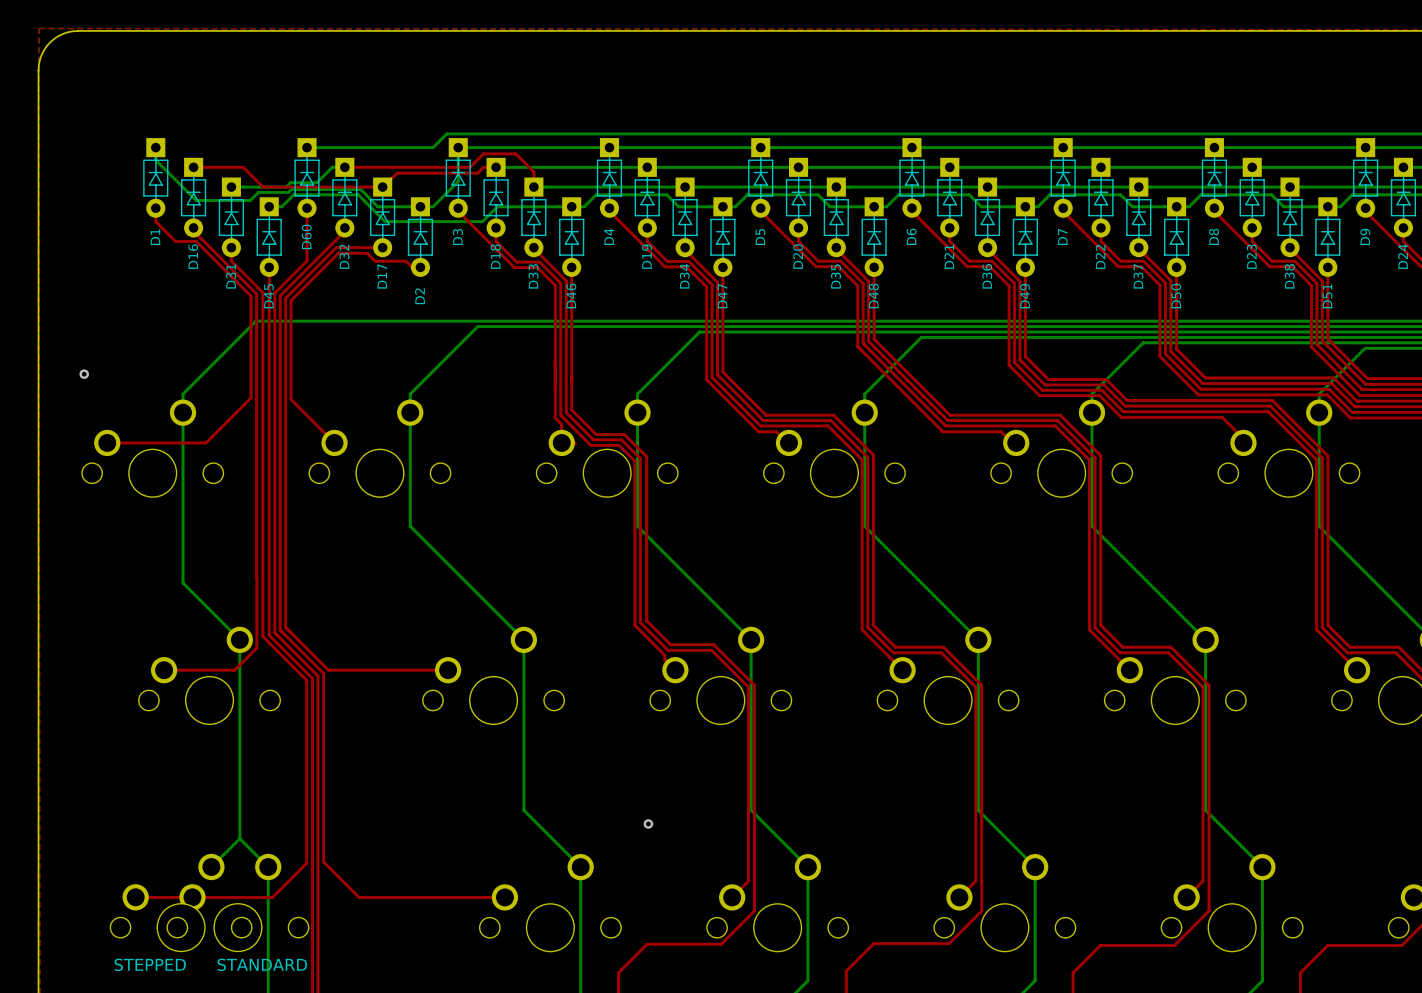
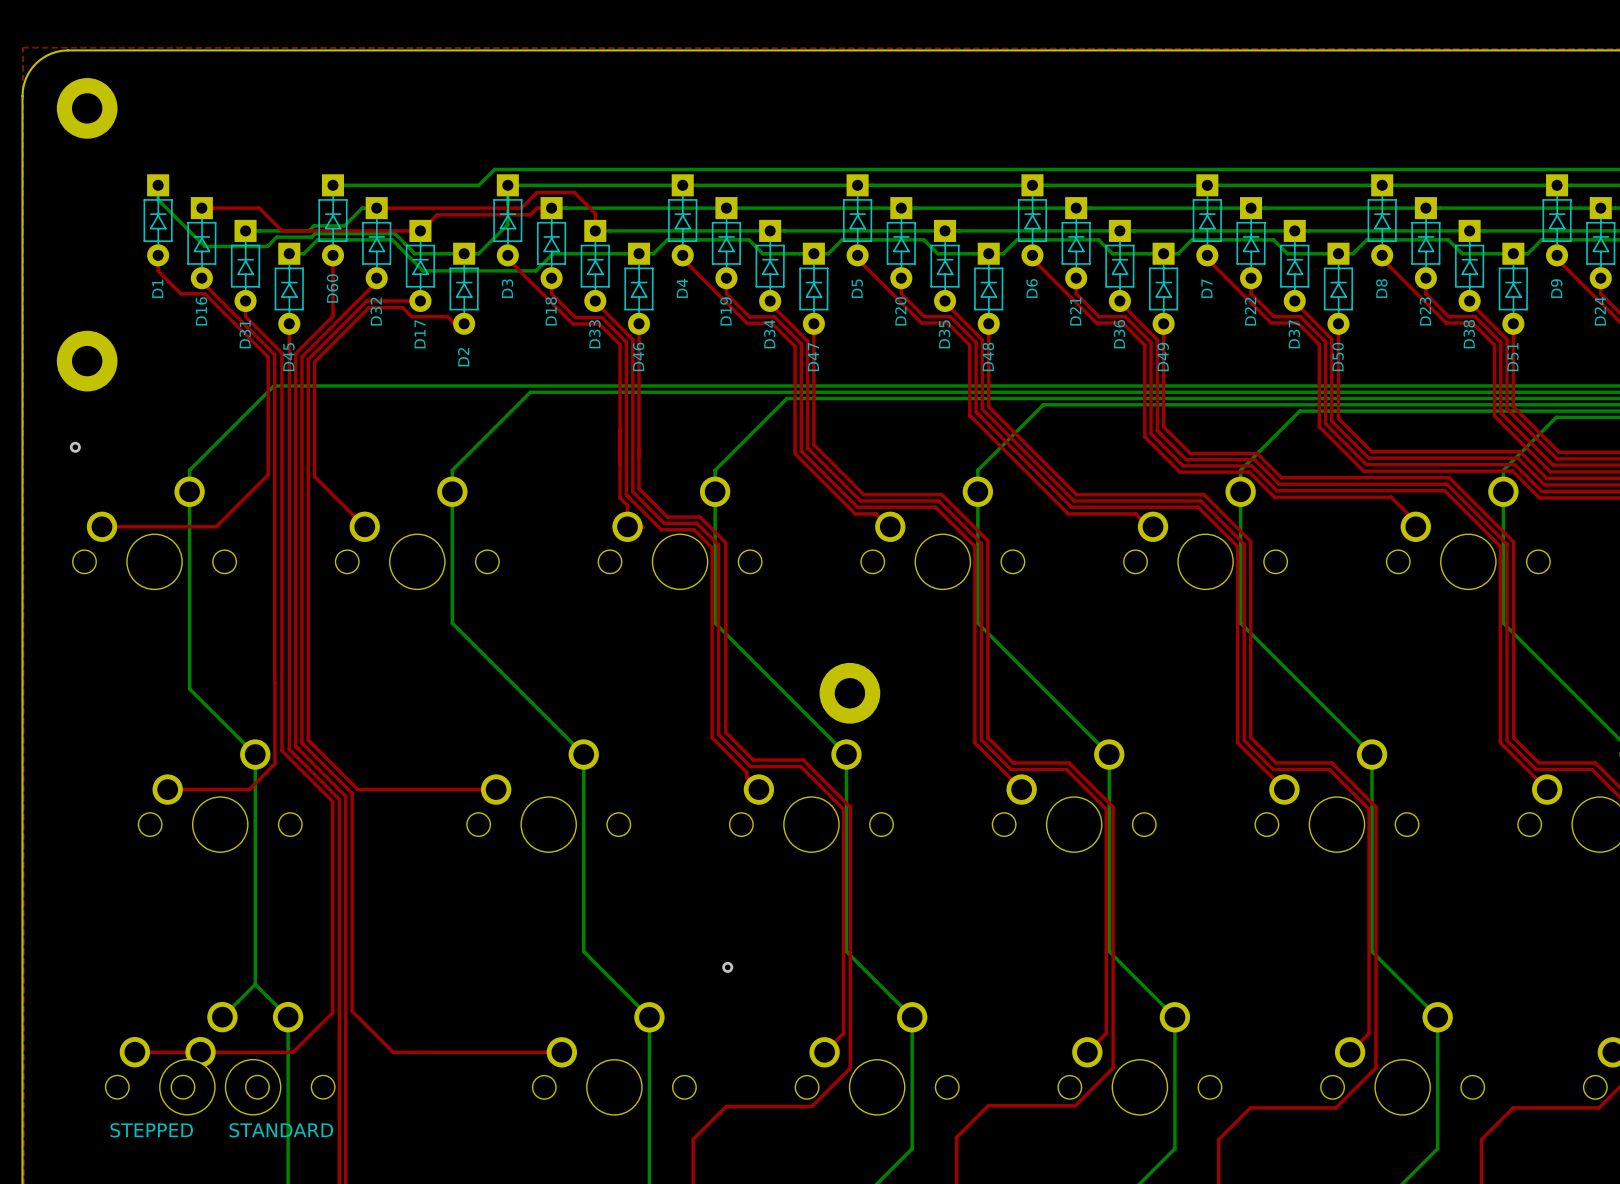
part: none -> (87, 108)
part: none -> (87, 361)
part: none -> (849, 693)

